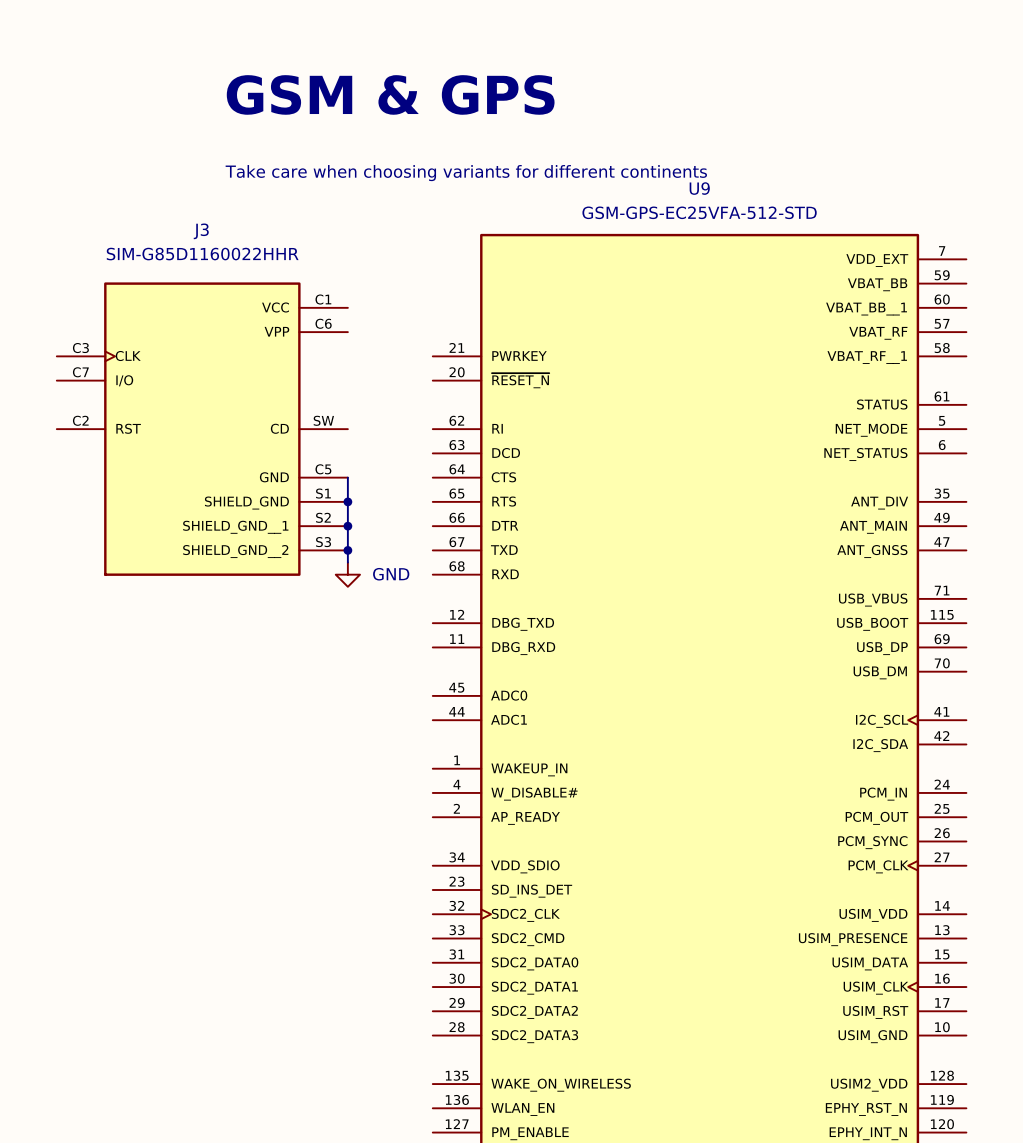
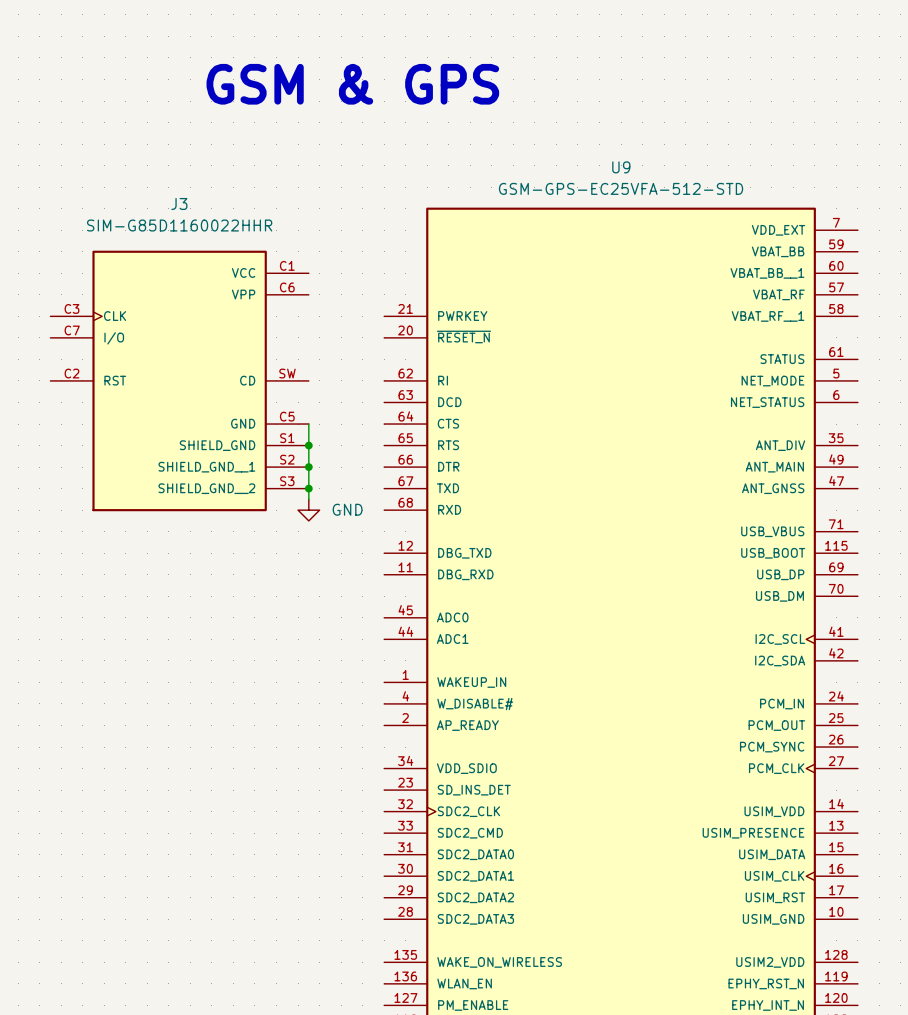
text: Take care when choosing variants for different continents (466, 173) -> none

